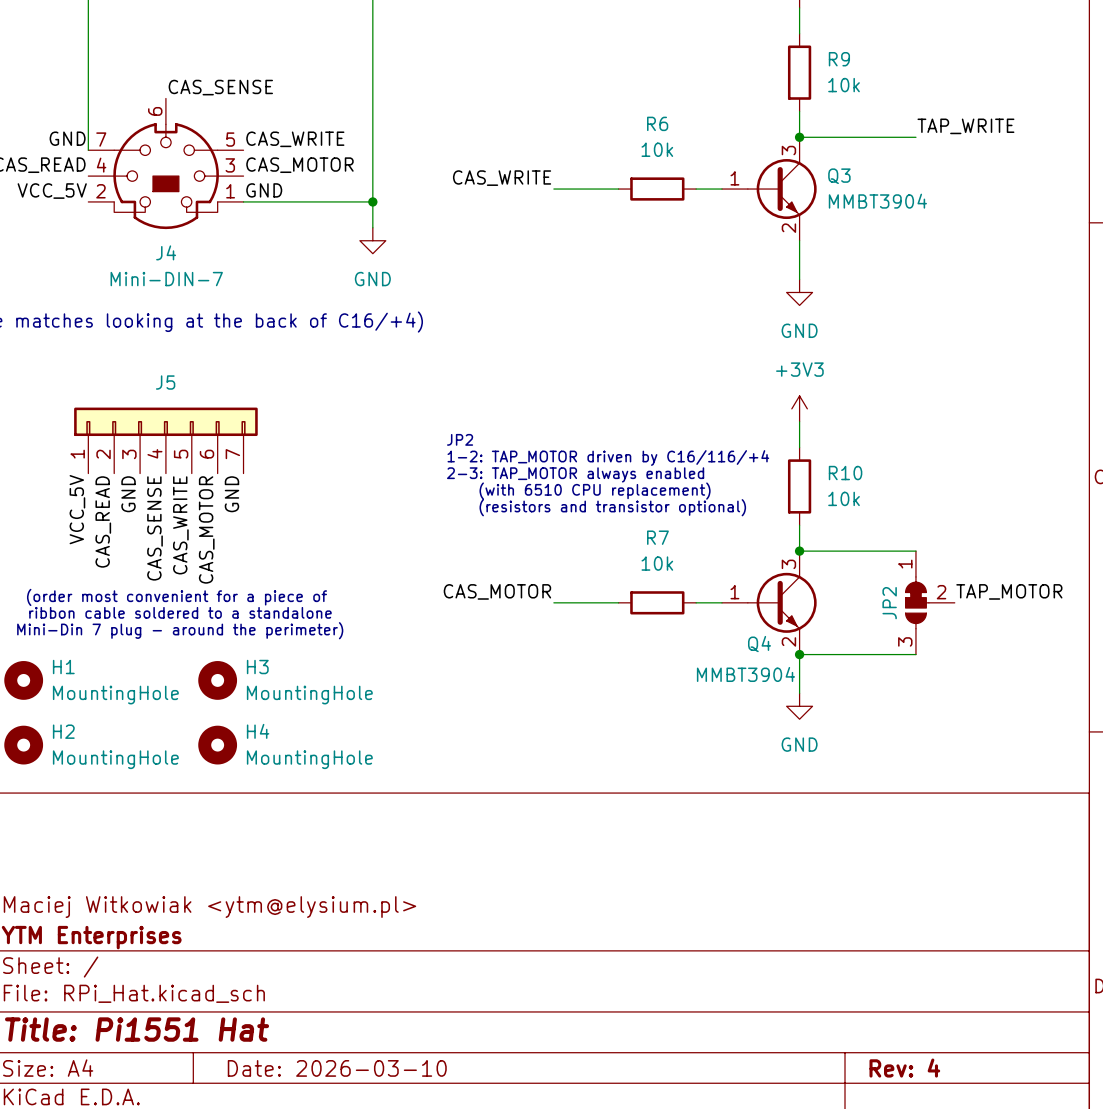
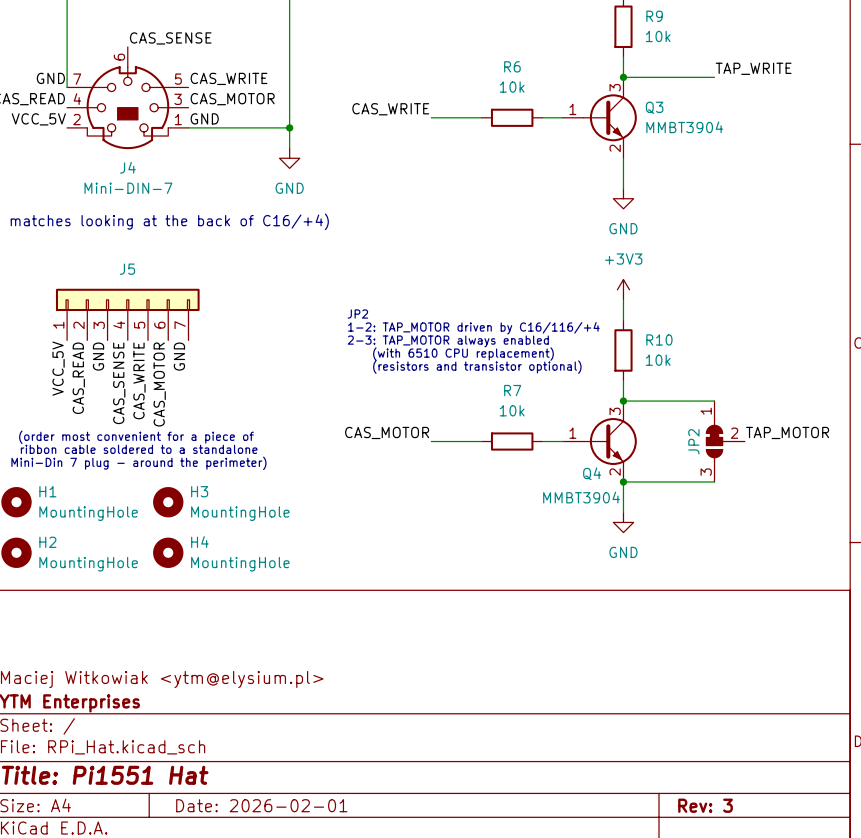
title block: Date: 2026-03-10 (337, 1068) -> Date: 2026-02-01 (261, 805)
title block: Rev: 4 (904, 1068) -> Rev: 3 (705, 805)

